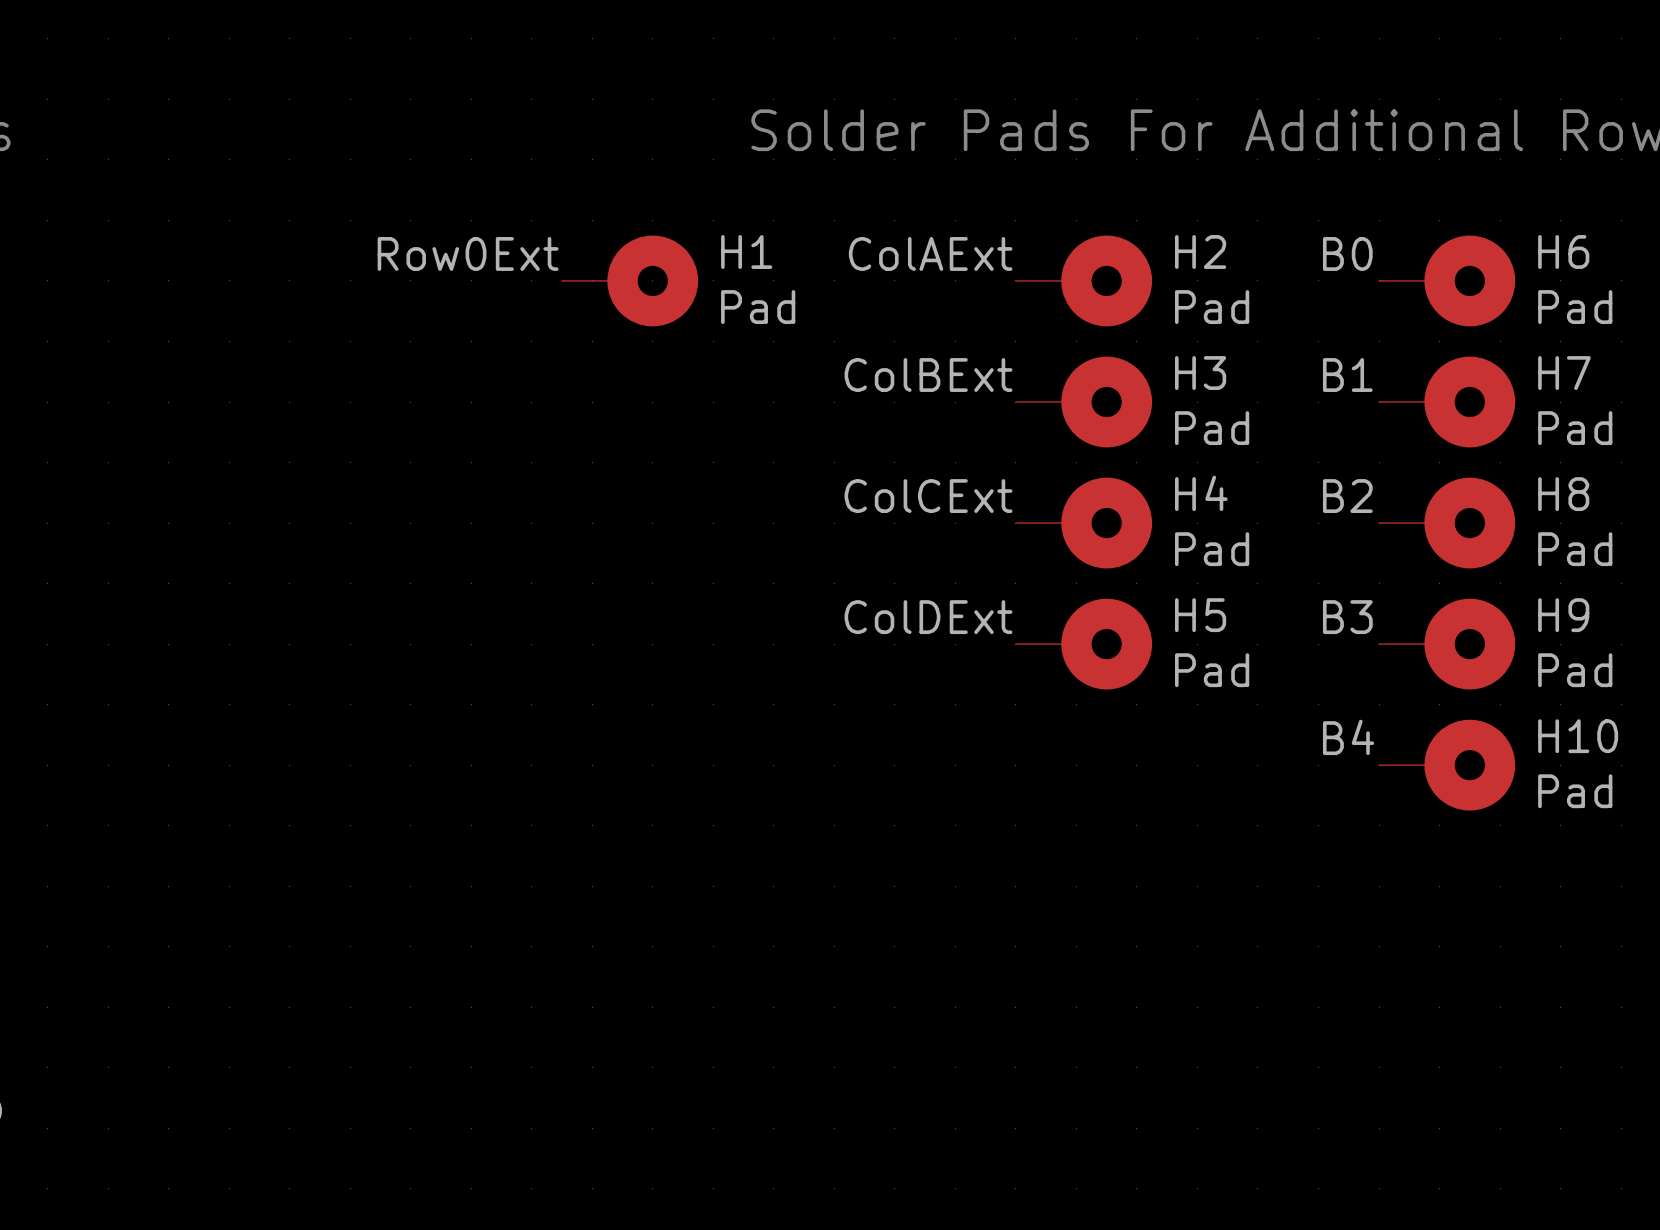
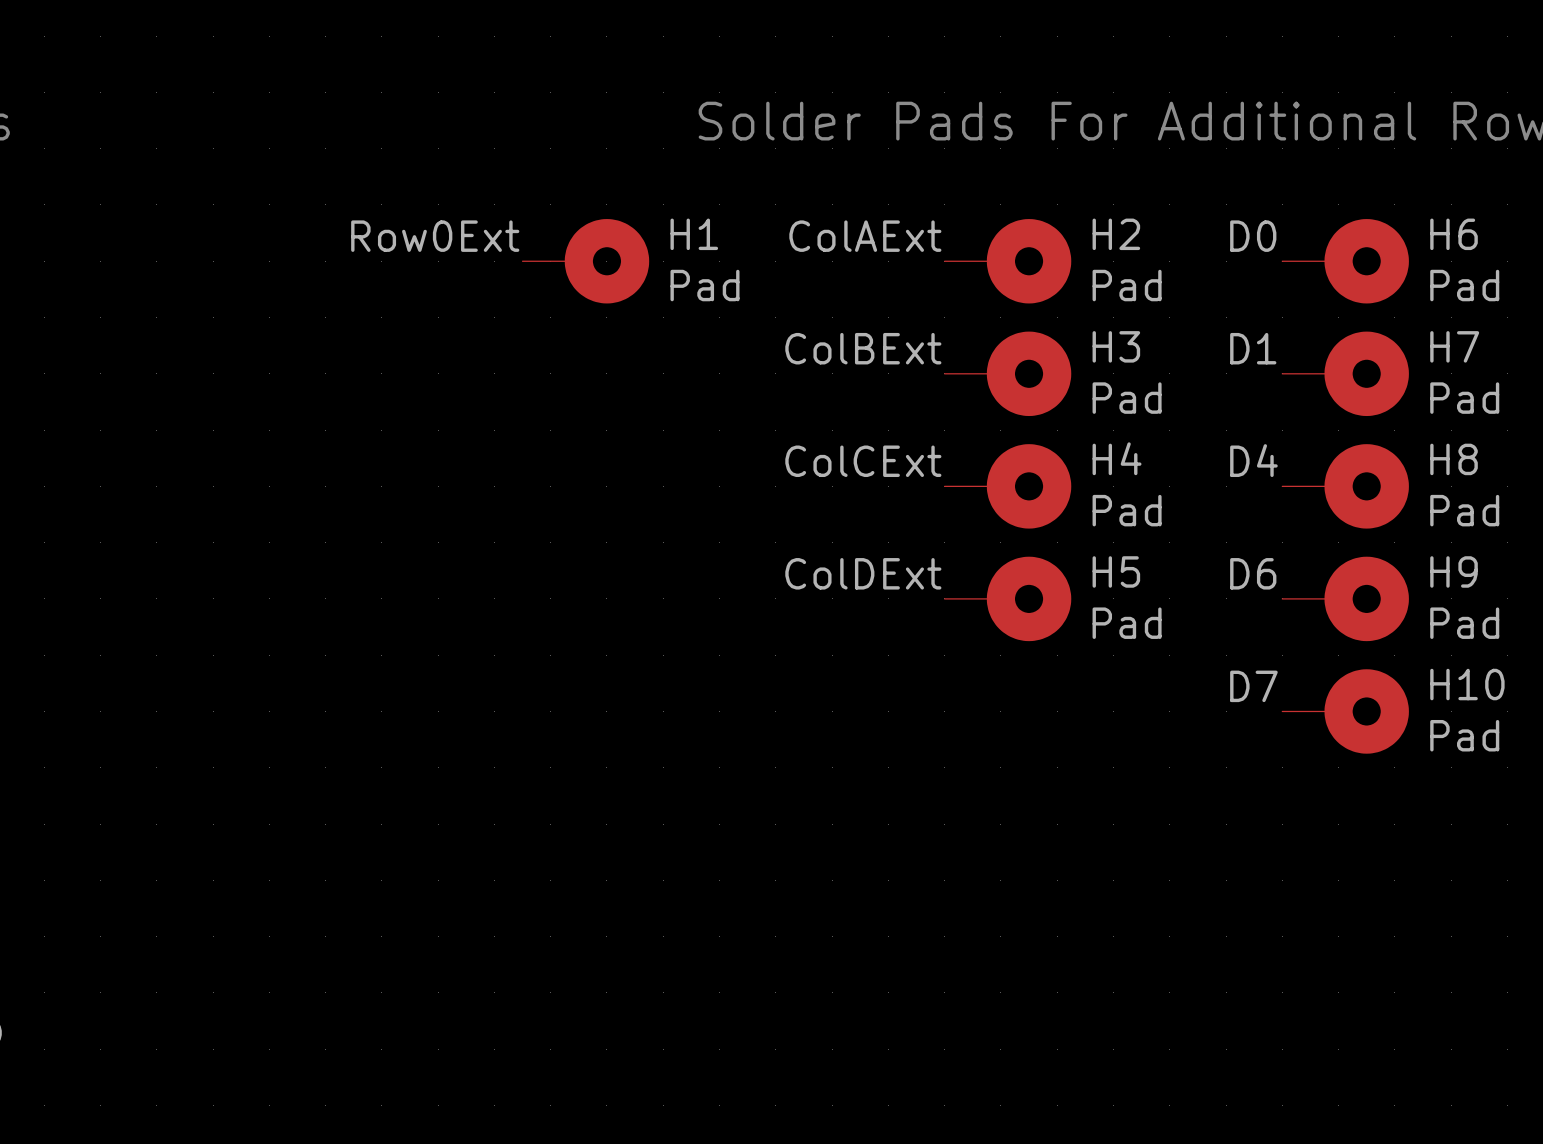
label: B0 (1347, 253) -> D0 (1253, 236)
label: B1 (1347, 375) -> D1 (1253, 348)
label: B2 (1347, 496) -> D4 (1253, 460)
label: B3 (1347, 617) -> D6 (1253, 573)
label: B4 (1348, 737) -> D7 (1253, 686)

